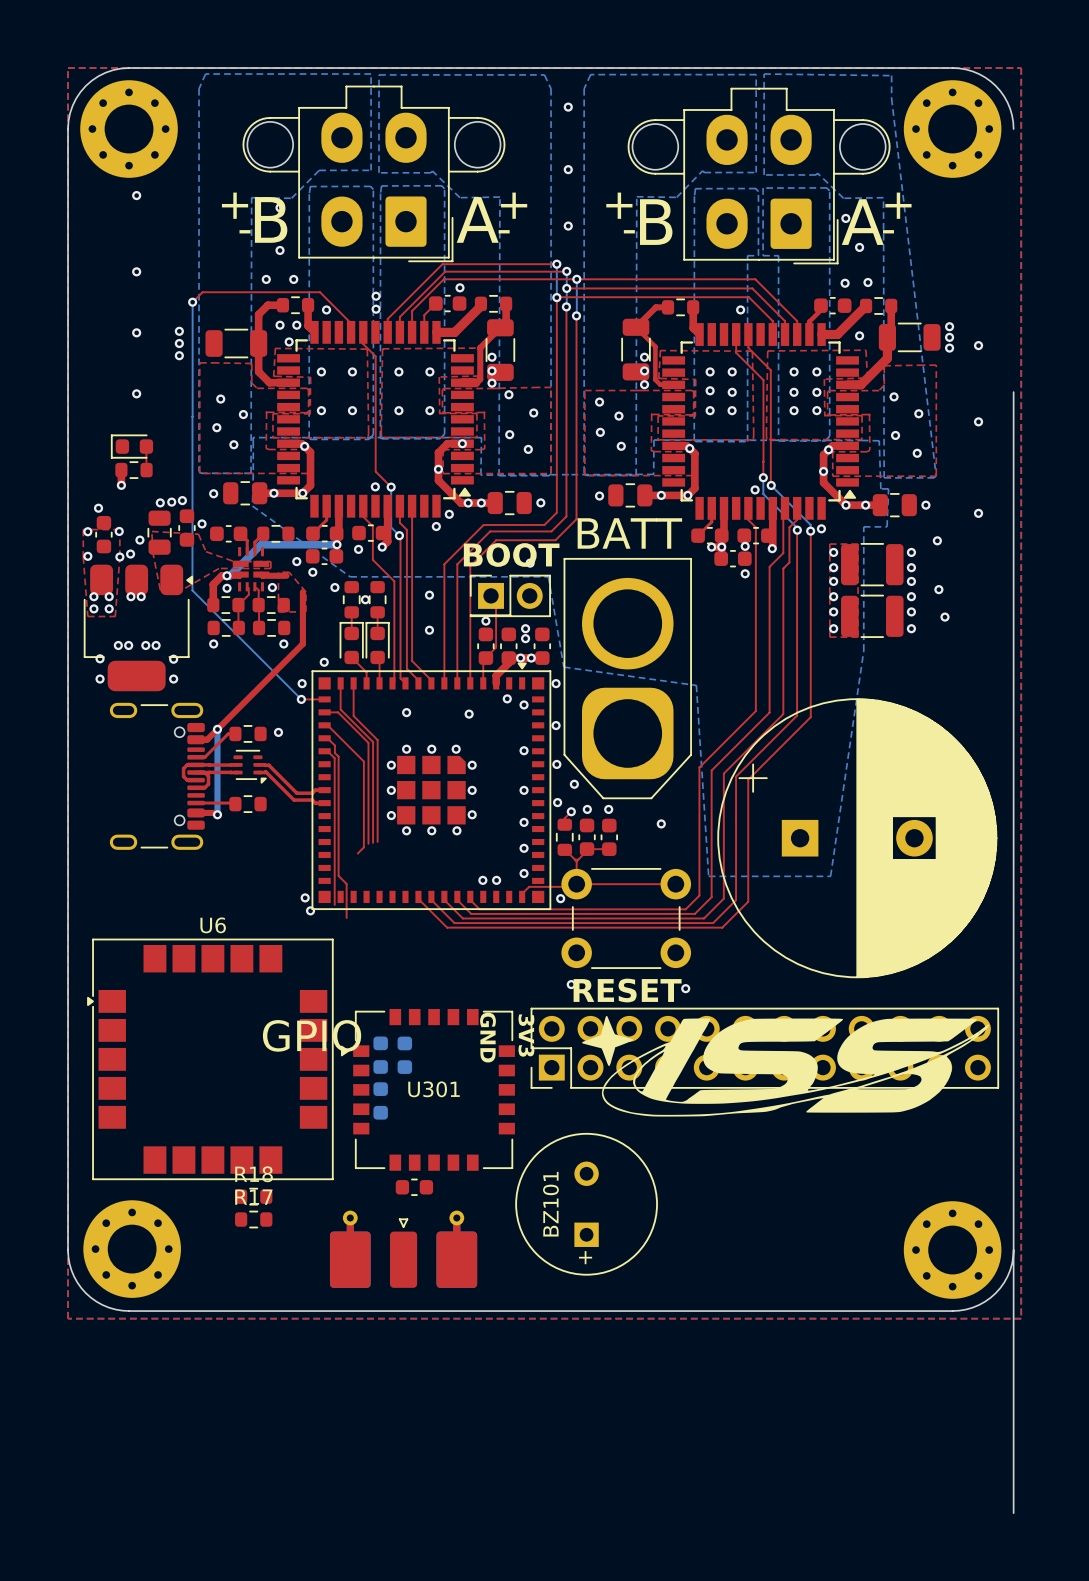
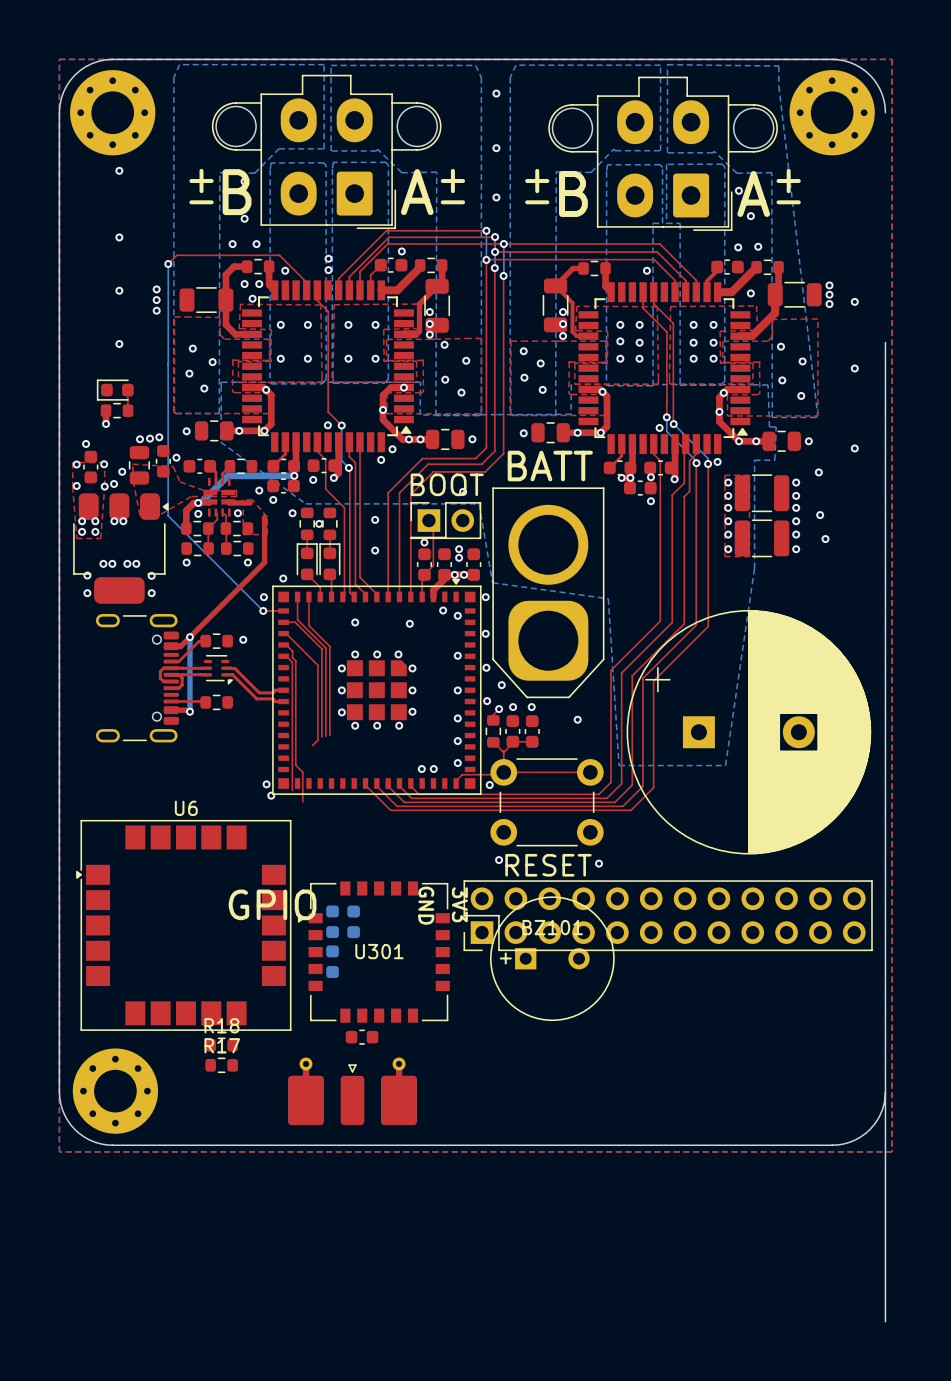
drawing: [582, 1015, 990, 1117] -> none
BZ101 rotation: 0° (586, 1204) -> 90° clockwise (552, 958)
BZ101 position: (586, 1204) -> (552, 958)
part: (952, 1250) -> none

